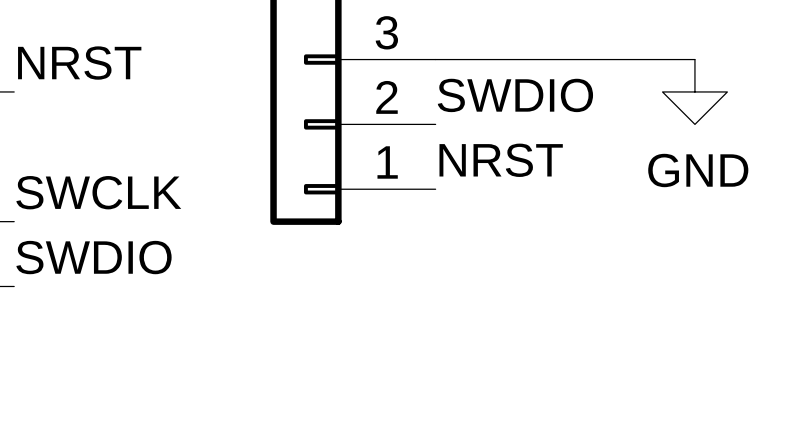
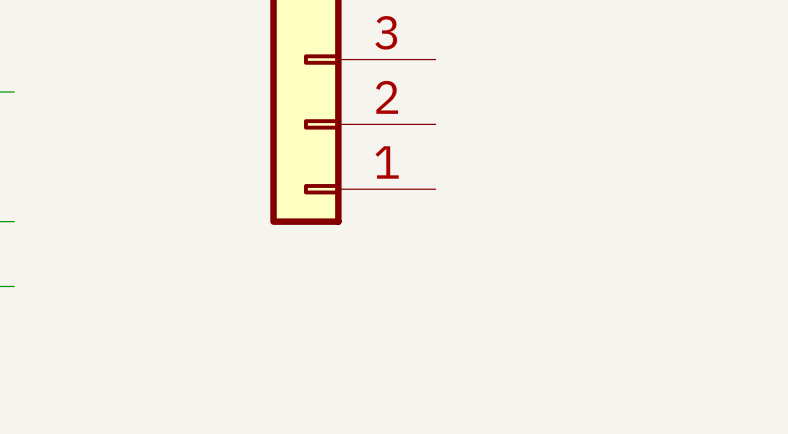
wire: (435, 59) (694, 59) -> none
label: NRST (79, 63) -> none
power symbol: GND (694, 91) -> none
label: SWDIO (515, 95) -> none
label: NRST (501, 160) -> none
label: SWCLK (98, 192) -> none
label: SWDIO (93, 257) -> none

